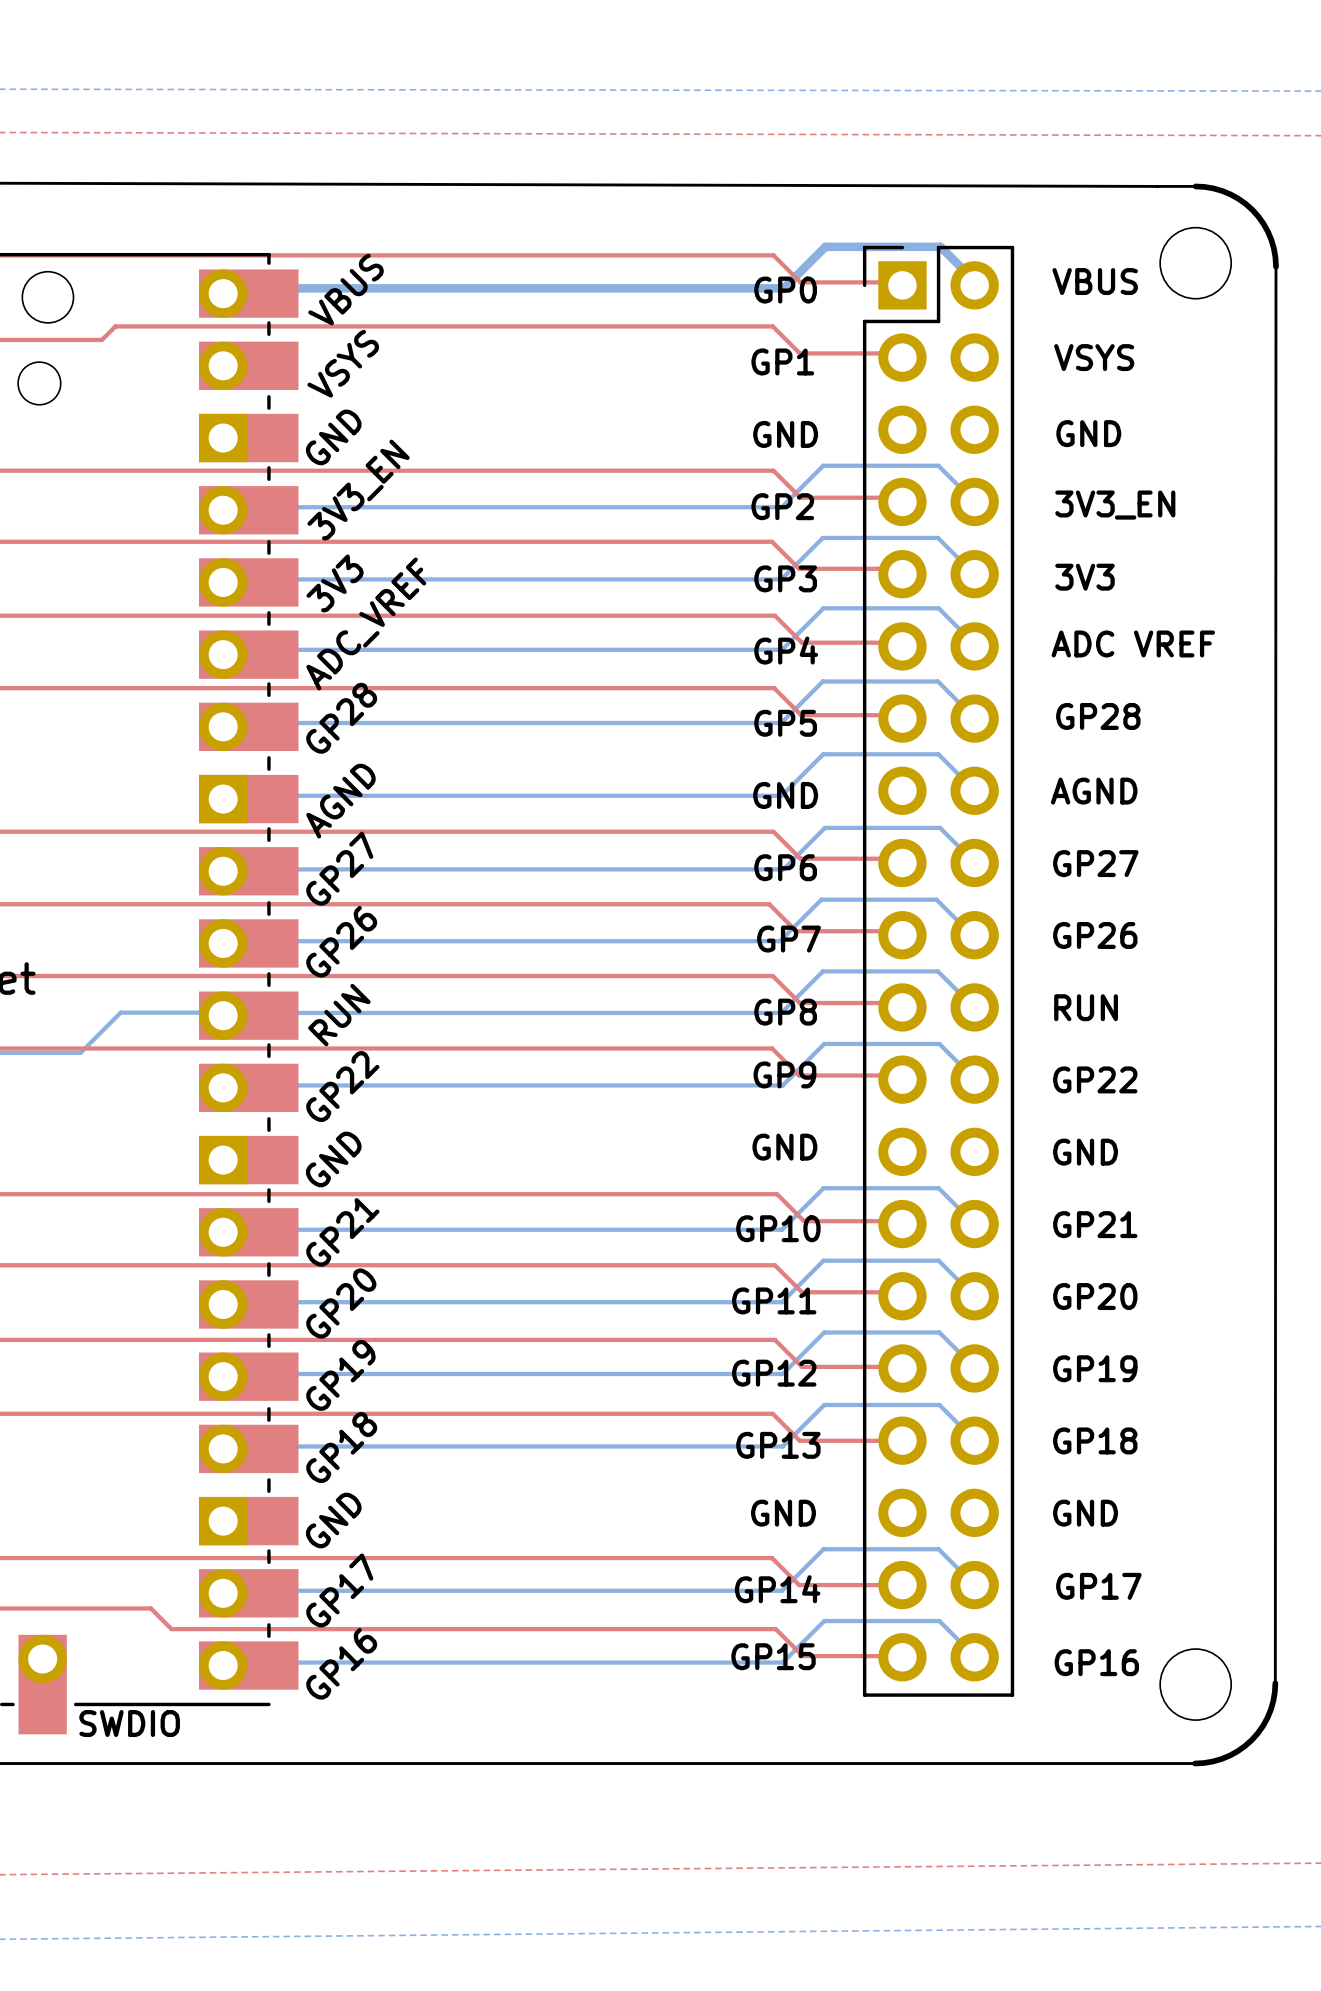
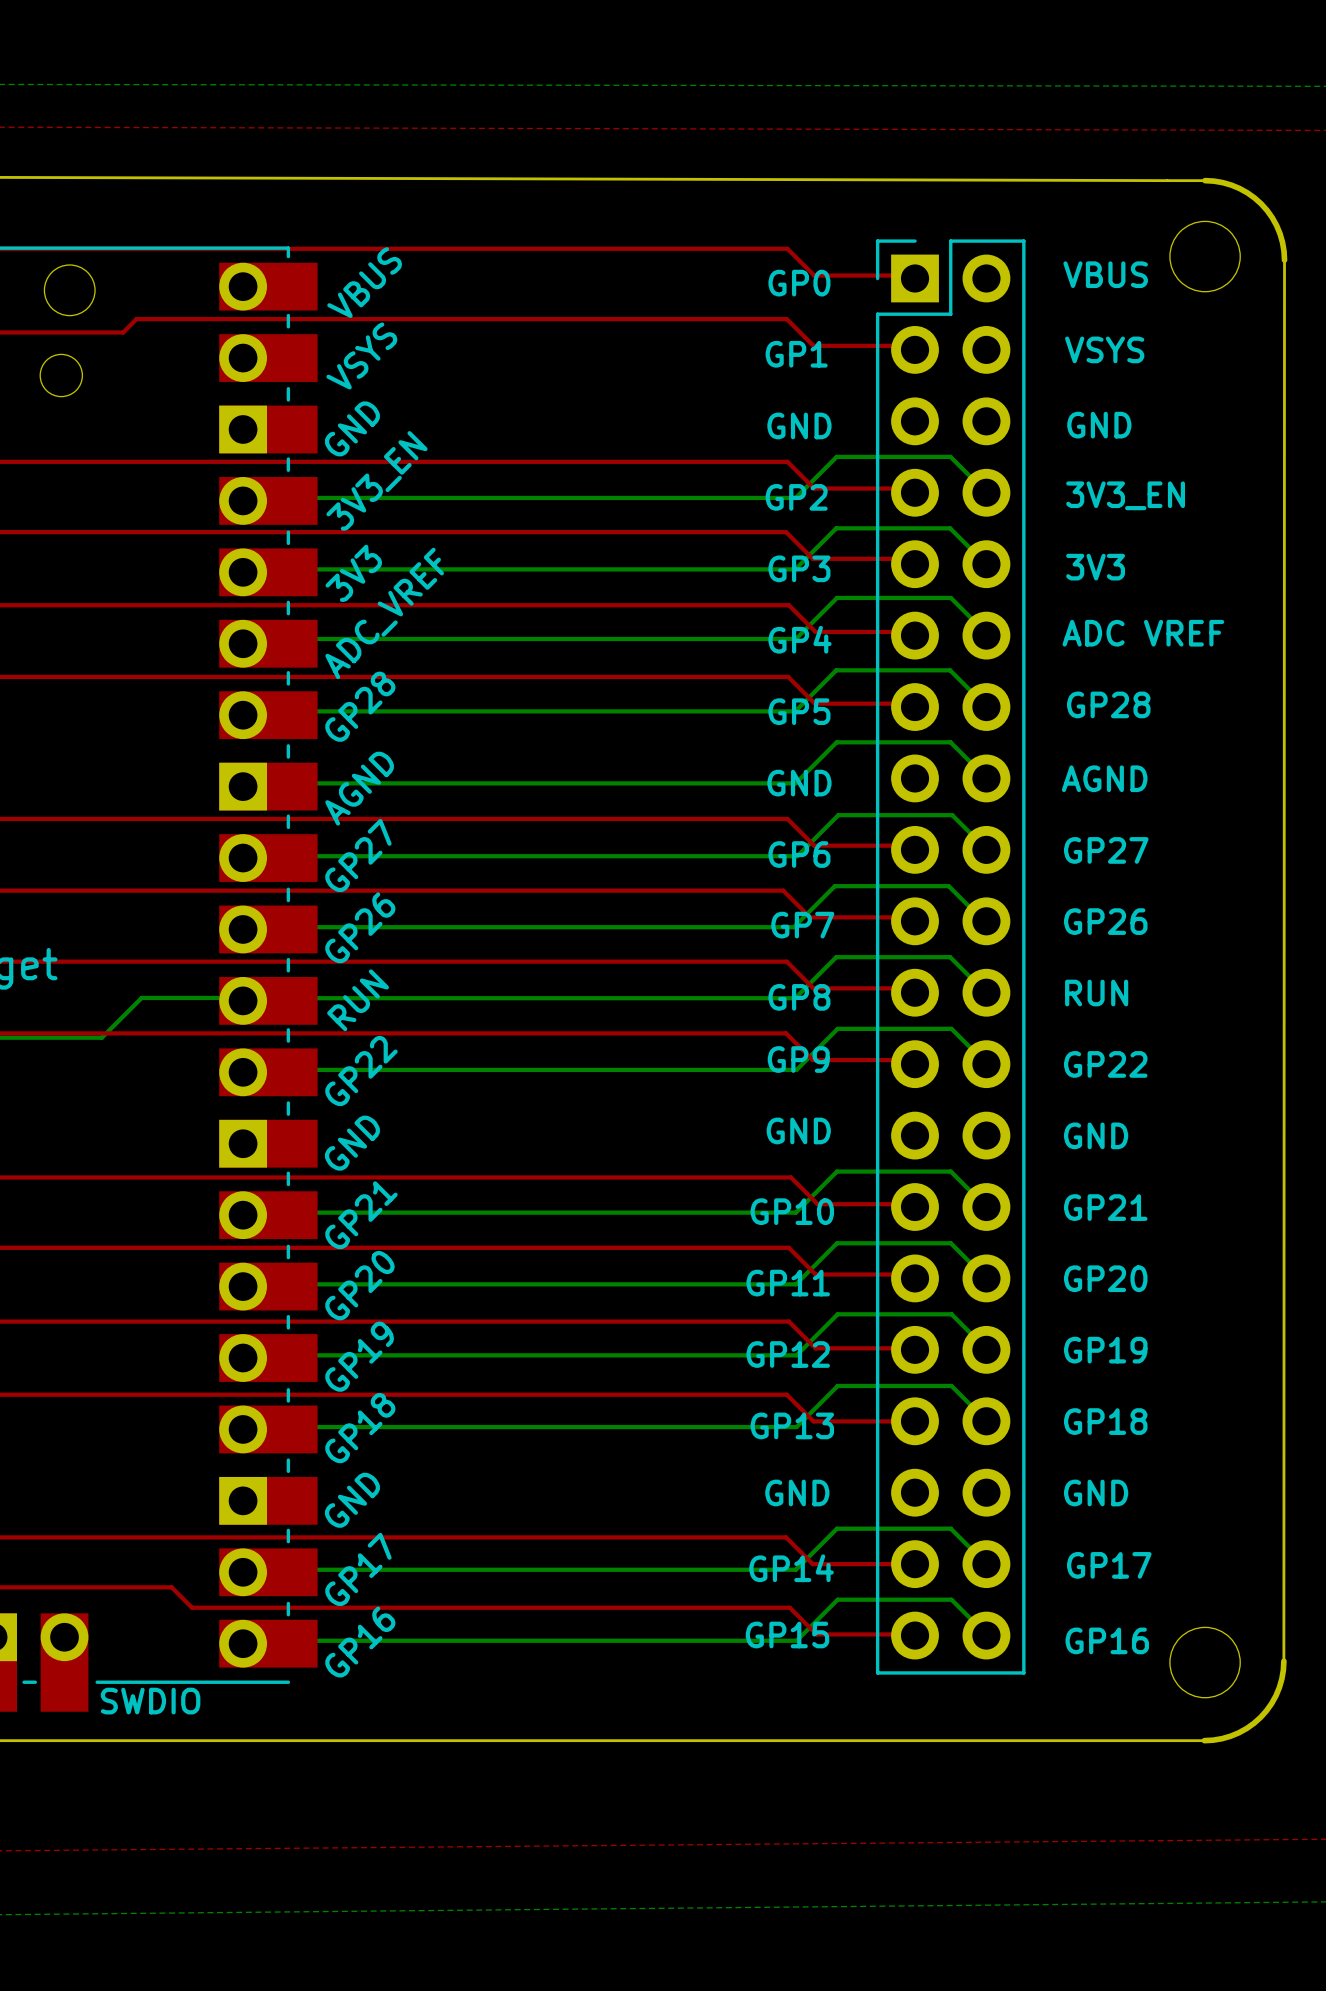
bottom track: (976, 283) (940, 246) (825, 246) (783, 288) (226, 288) -> none

